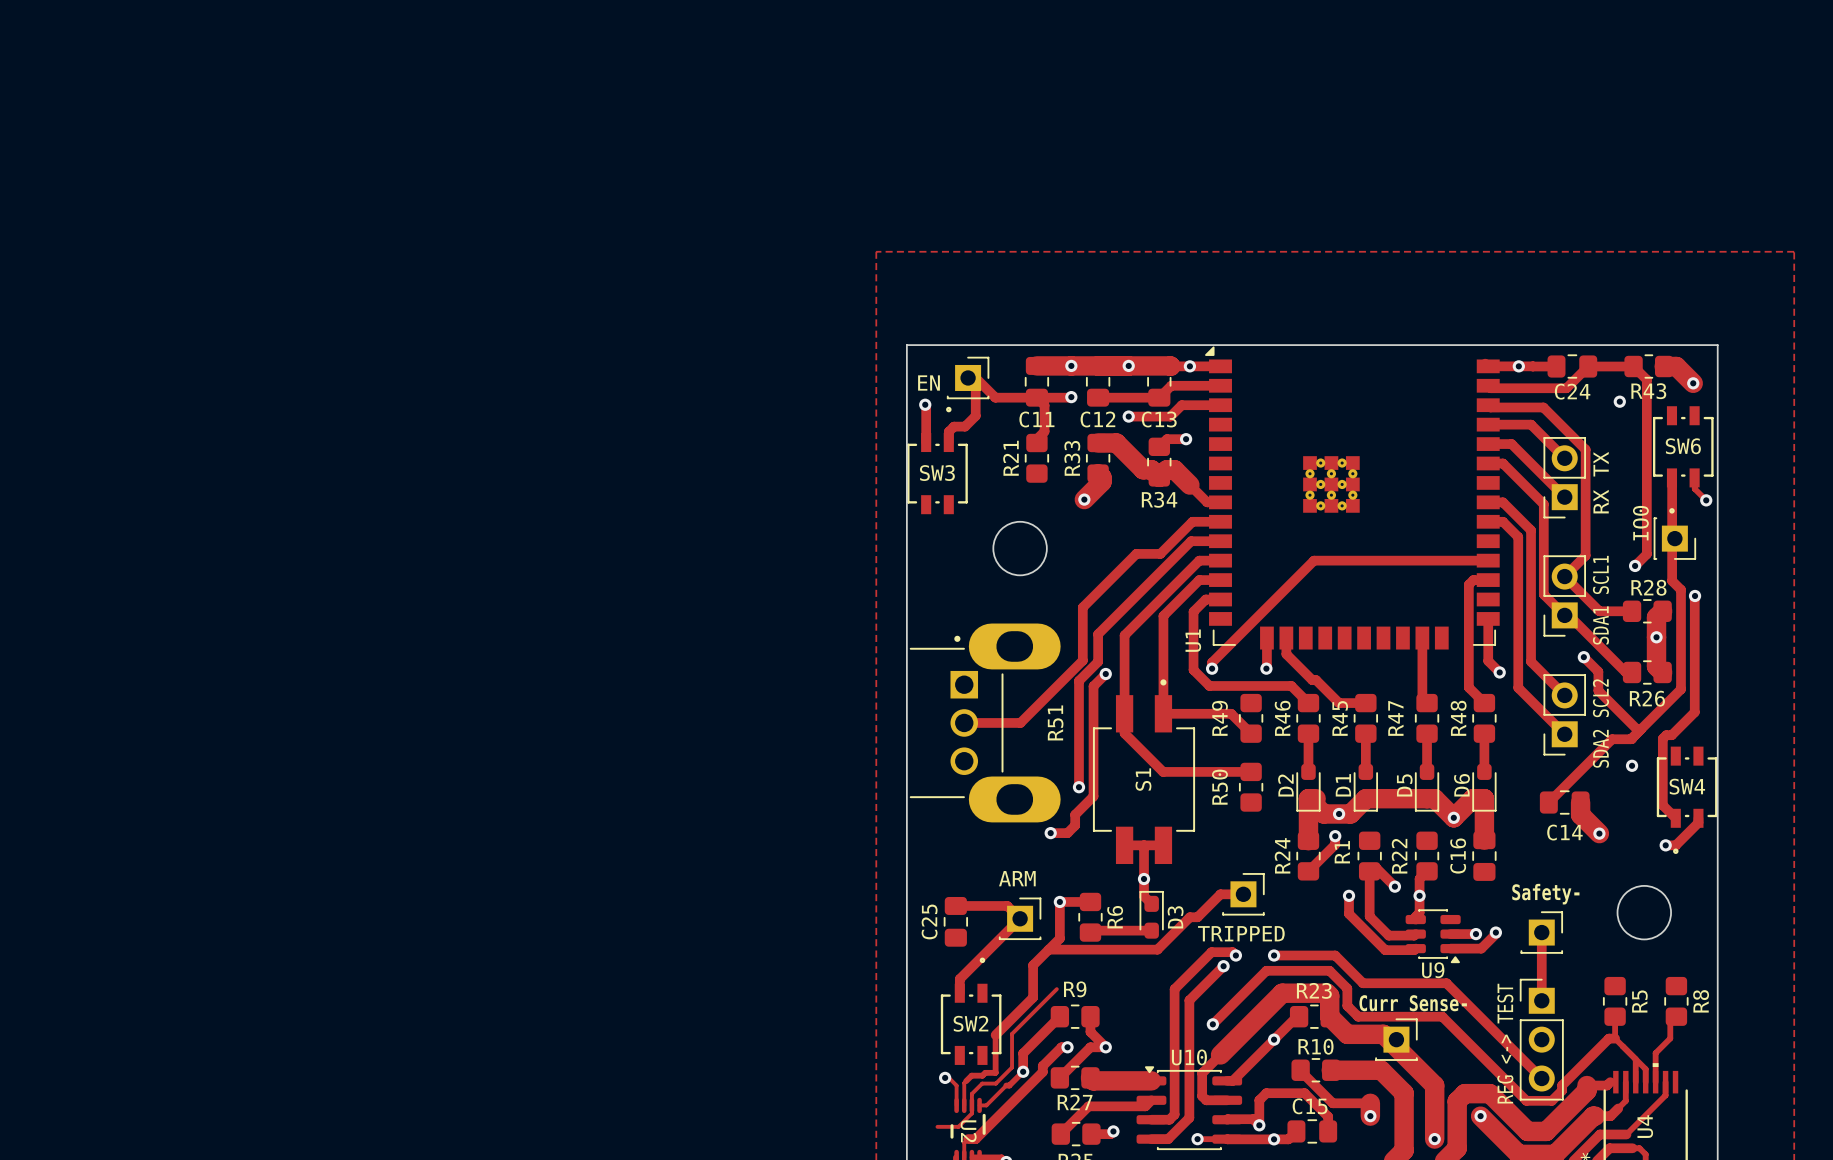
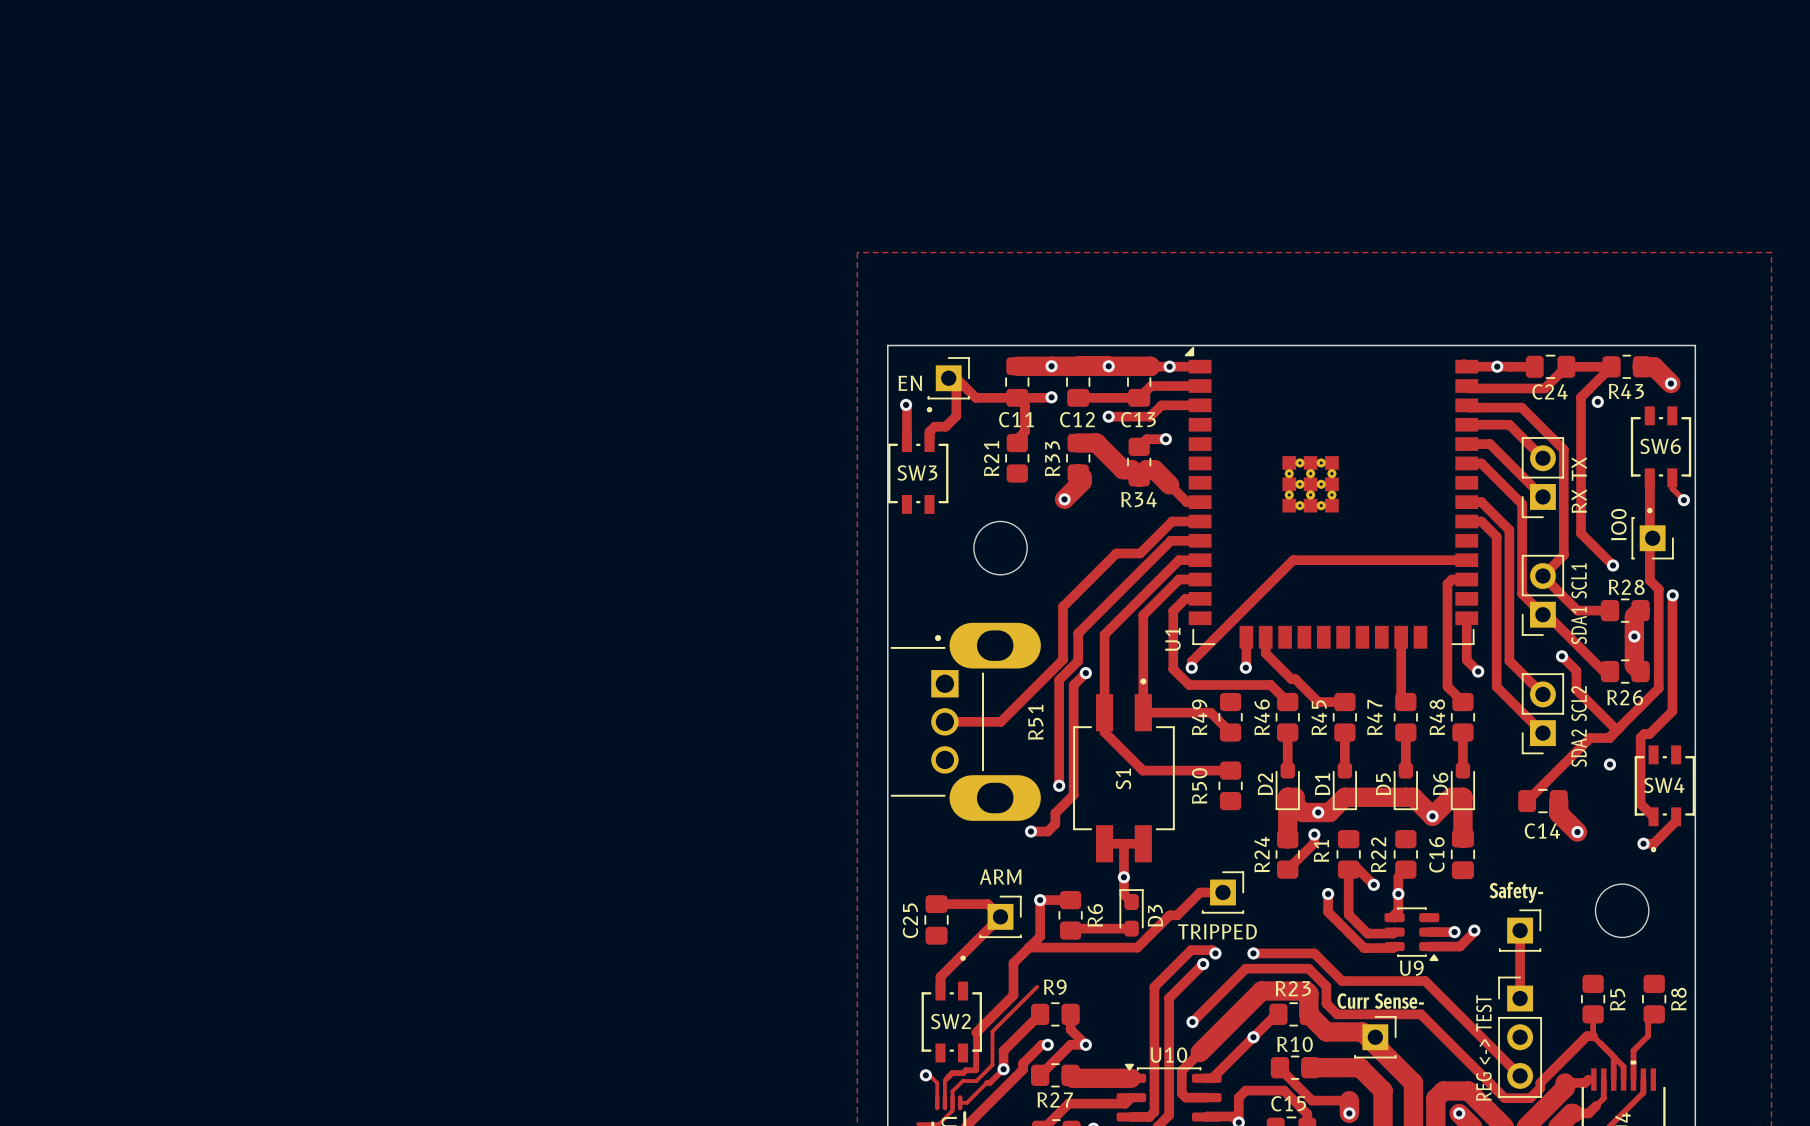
track: (1633, 366) (1646, 379) (1646, 554) (1635, 565) -> (1611, 366) (1581, 397) (1581, 533) (1613, 565)

